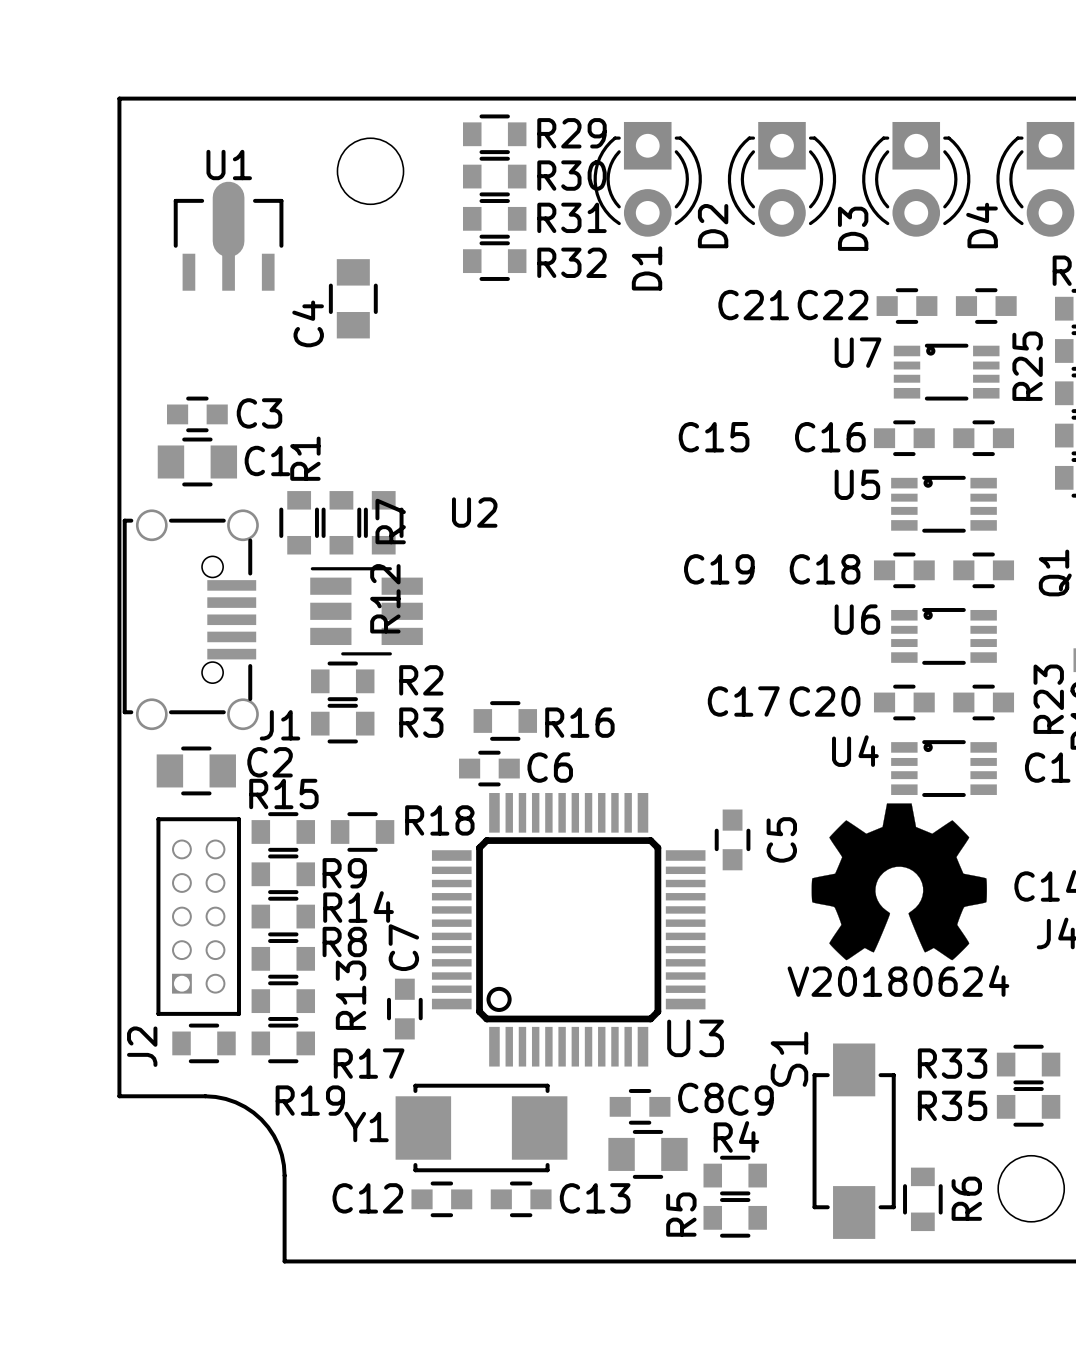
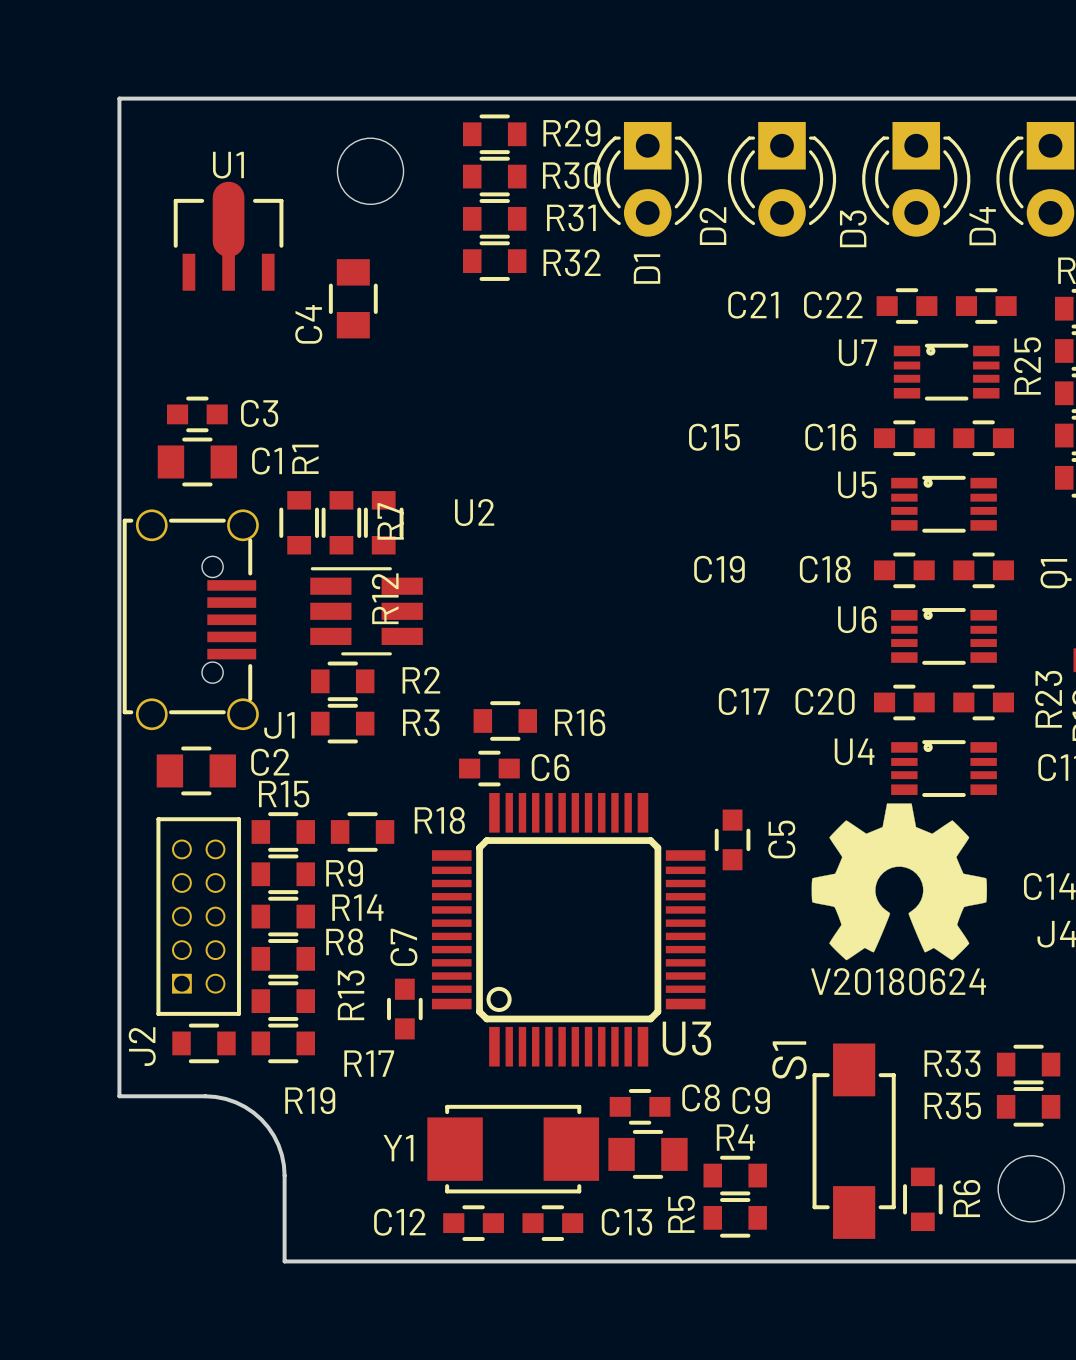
Y1 position: (481, 1127) -> (513, 1149)
C12 position: (441, 1199) -> (473, 1223)
C13 position: (521, 1199) -> (552, 1223)

